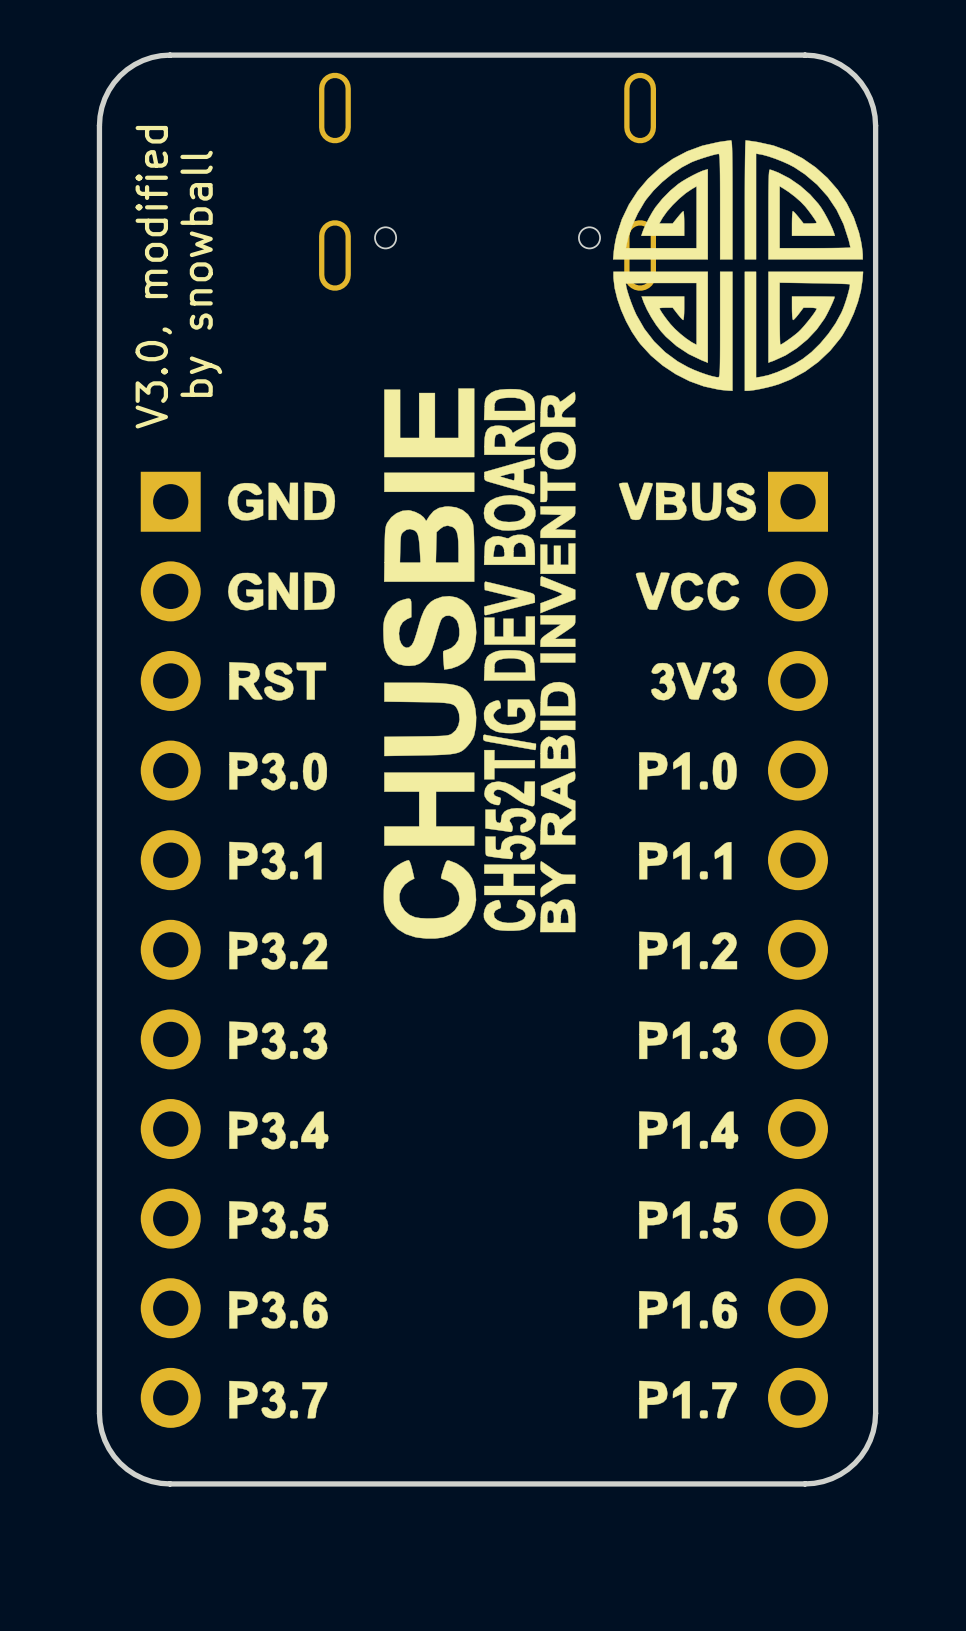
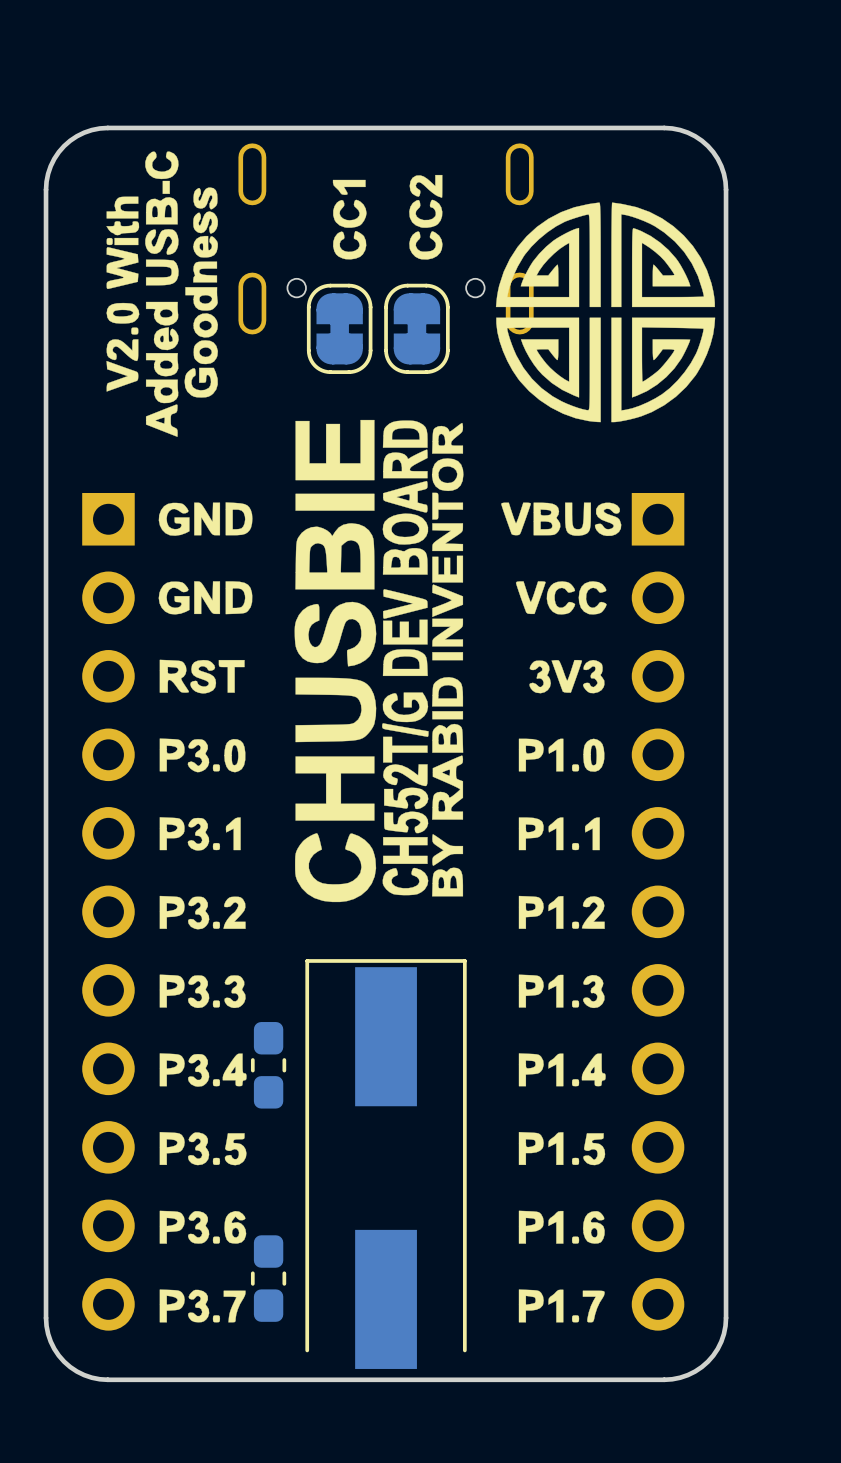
drawing: none -> [106, 151, 716, 1323]
drawing: [228, 140, 864, 1419] -> none
part: none -> (339, 328)
part: none -> (416, 328)
part: none -> (268, 1065)
part: none -> (386, 1164)
part: none -> (268, 1278)

